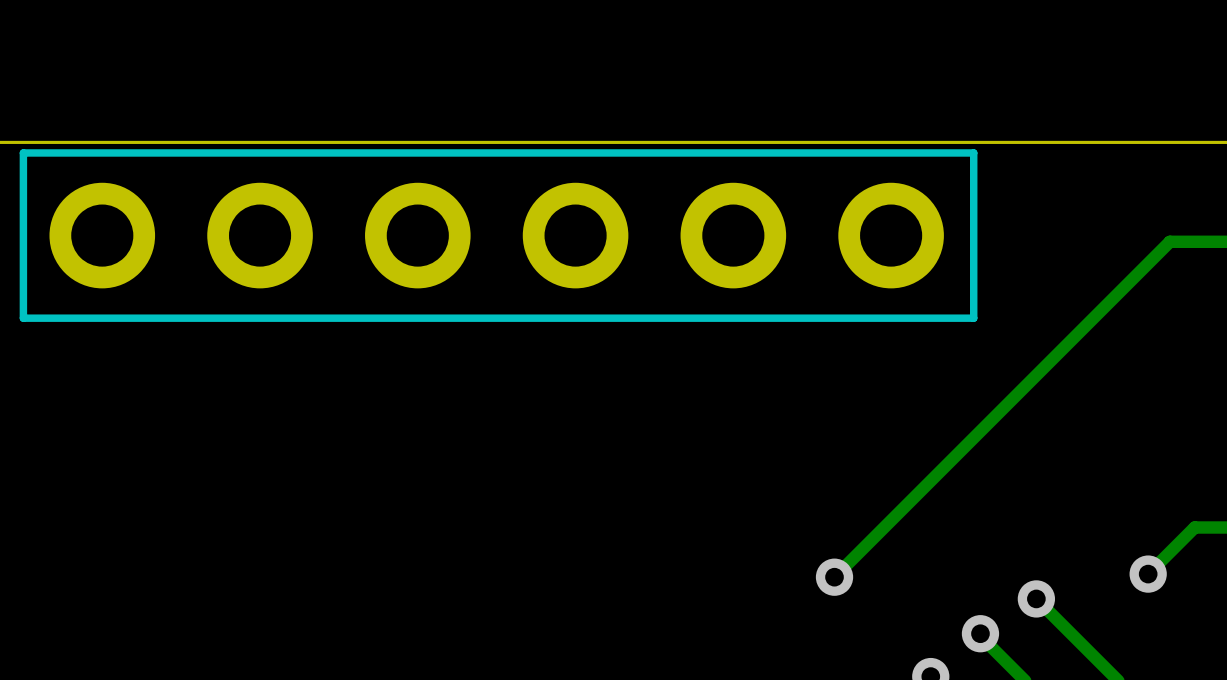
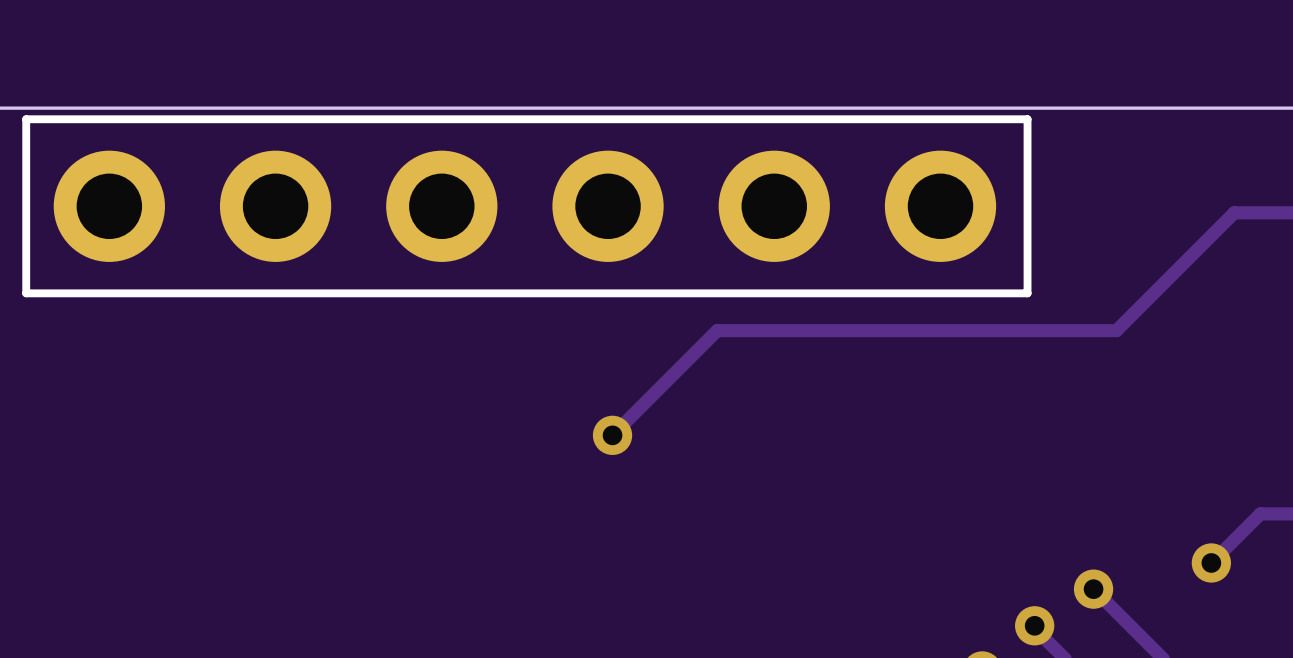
track: (1058, 353) (834, 577) -> (1116, 330) (717, 330) (612, 435)
via position: (834, 577) -> (612, 435)

